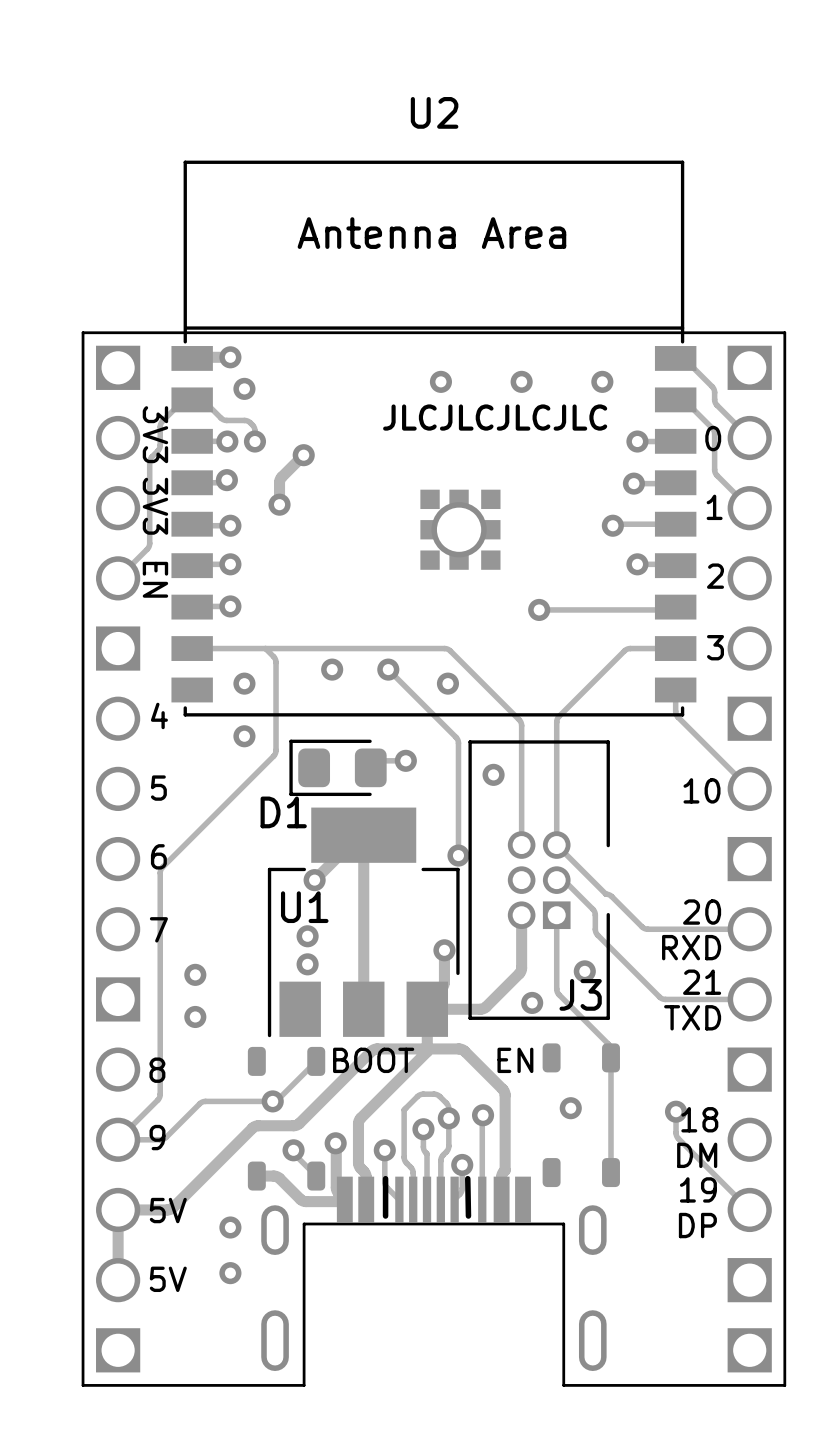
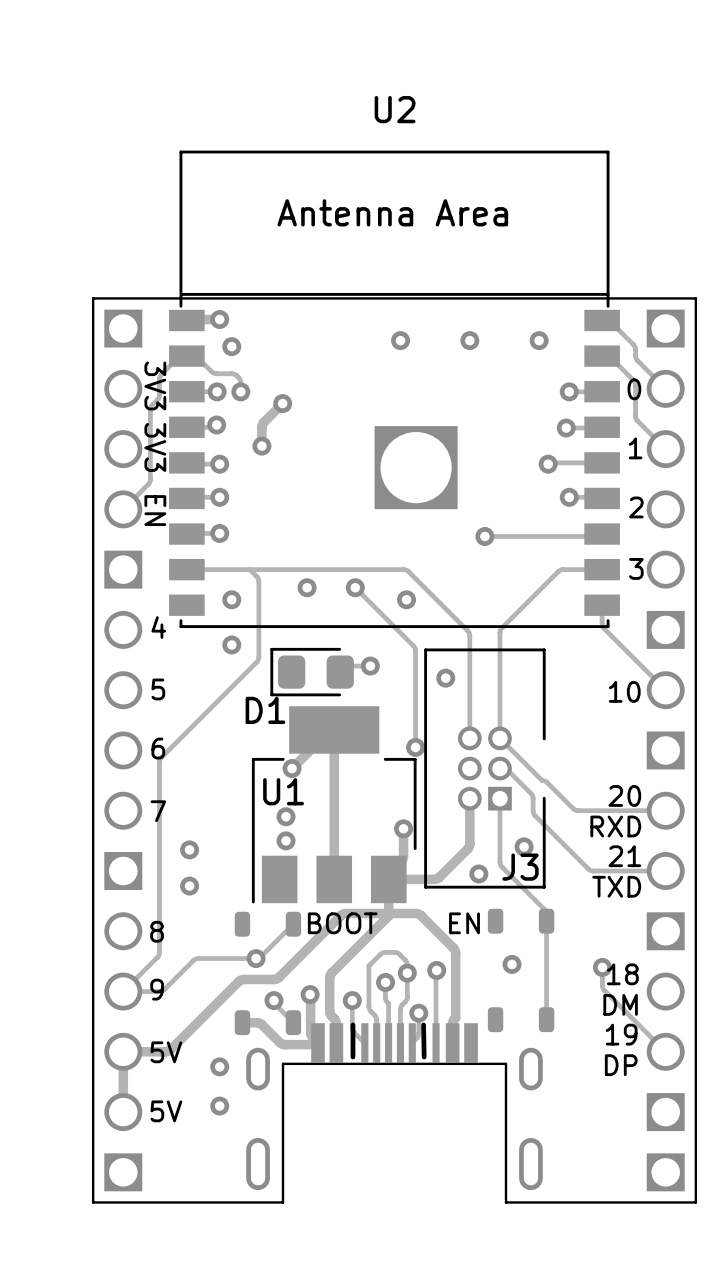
U2 footprint: [171, 160, 697, 717] -> [169, 150, 620, 629]
drawing: [383, 404, 608, 431] -> none

